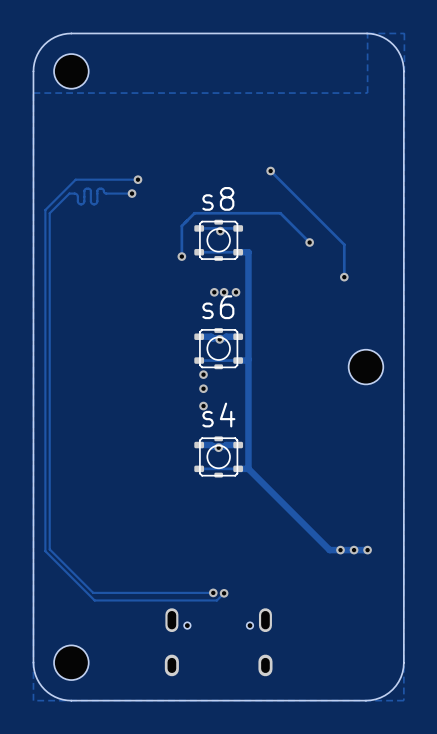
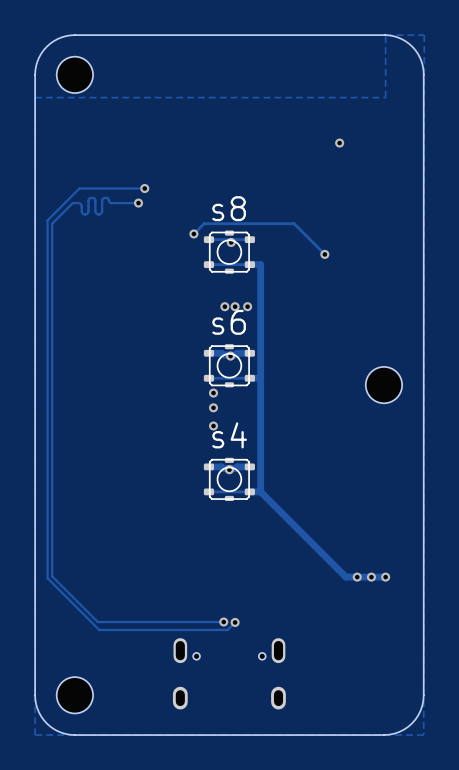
via: none -> (339, 143)
track: (270, 171) (344, 244) (344, 277) -> none
via: (270, 171) -> none
track: (184, 223) (181, 225) (181, 256) -> none
via position: (181, 256) -> (193, 233)
via: (344, 277) -> none

